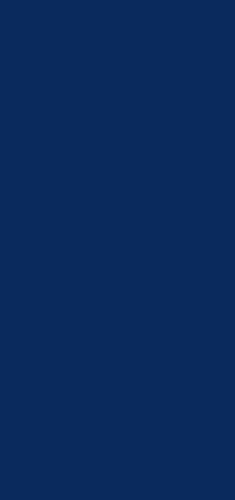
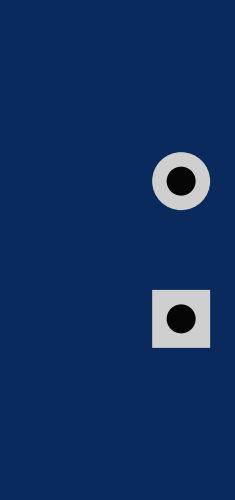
part: none -> (181, 250)

